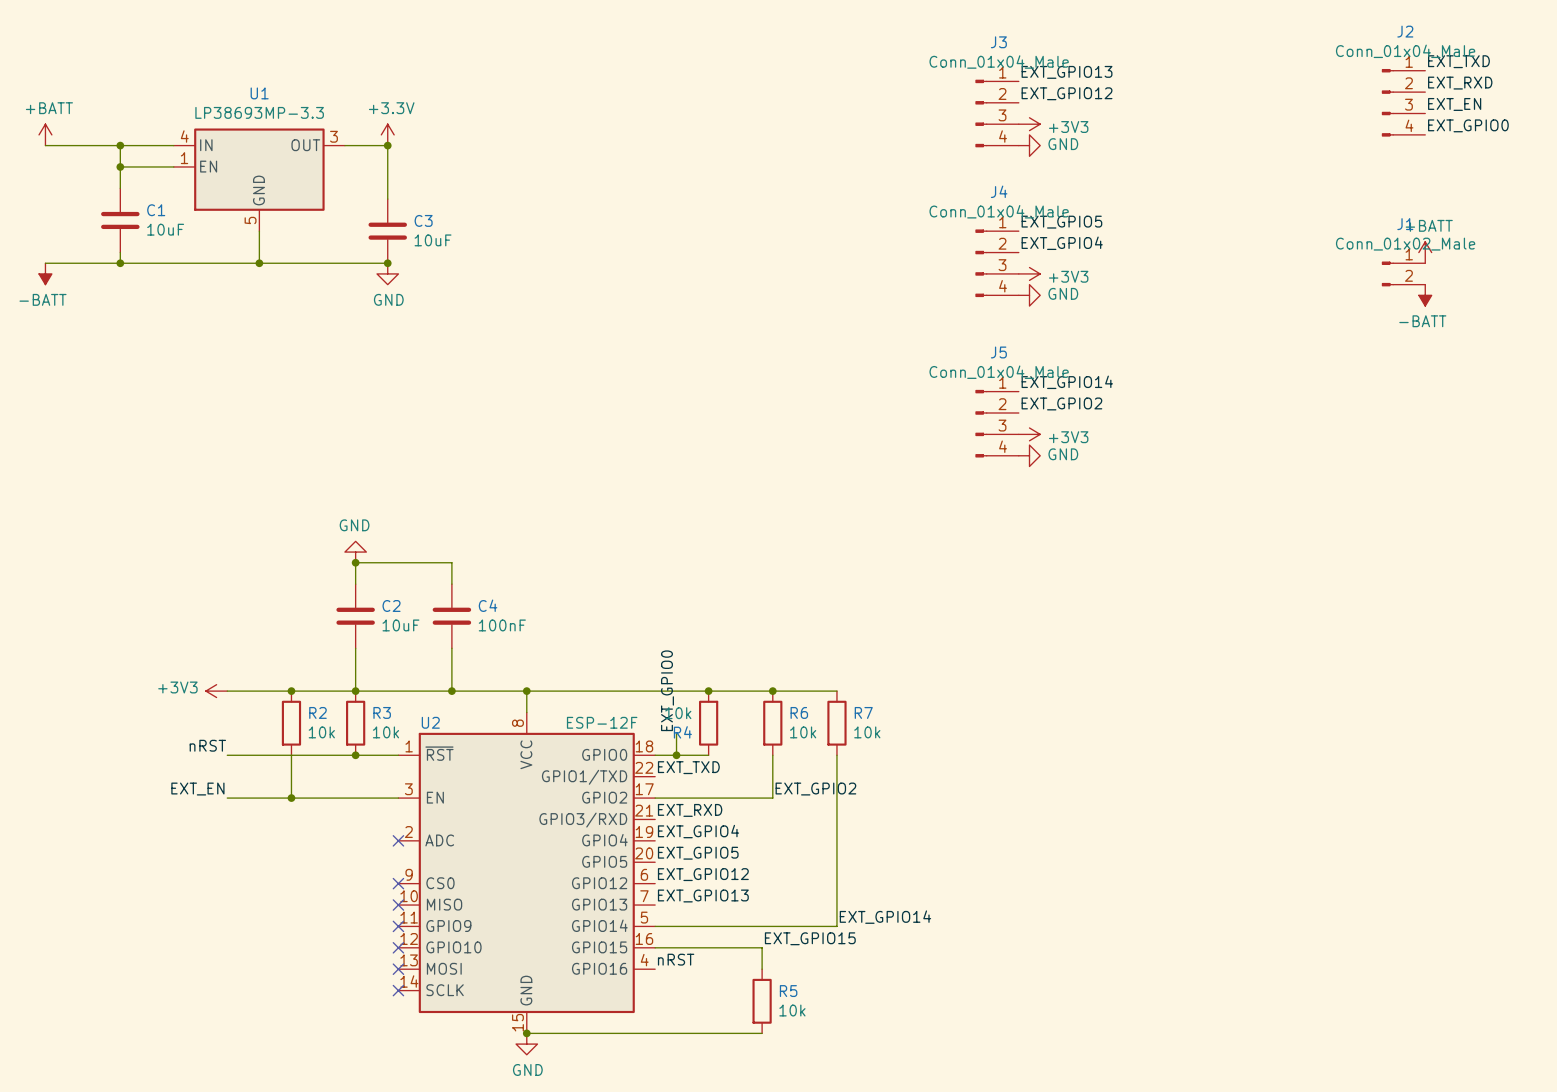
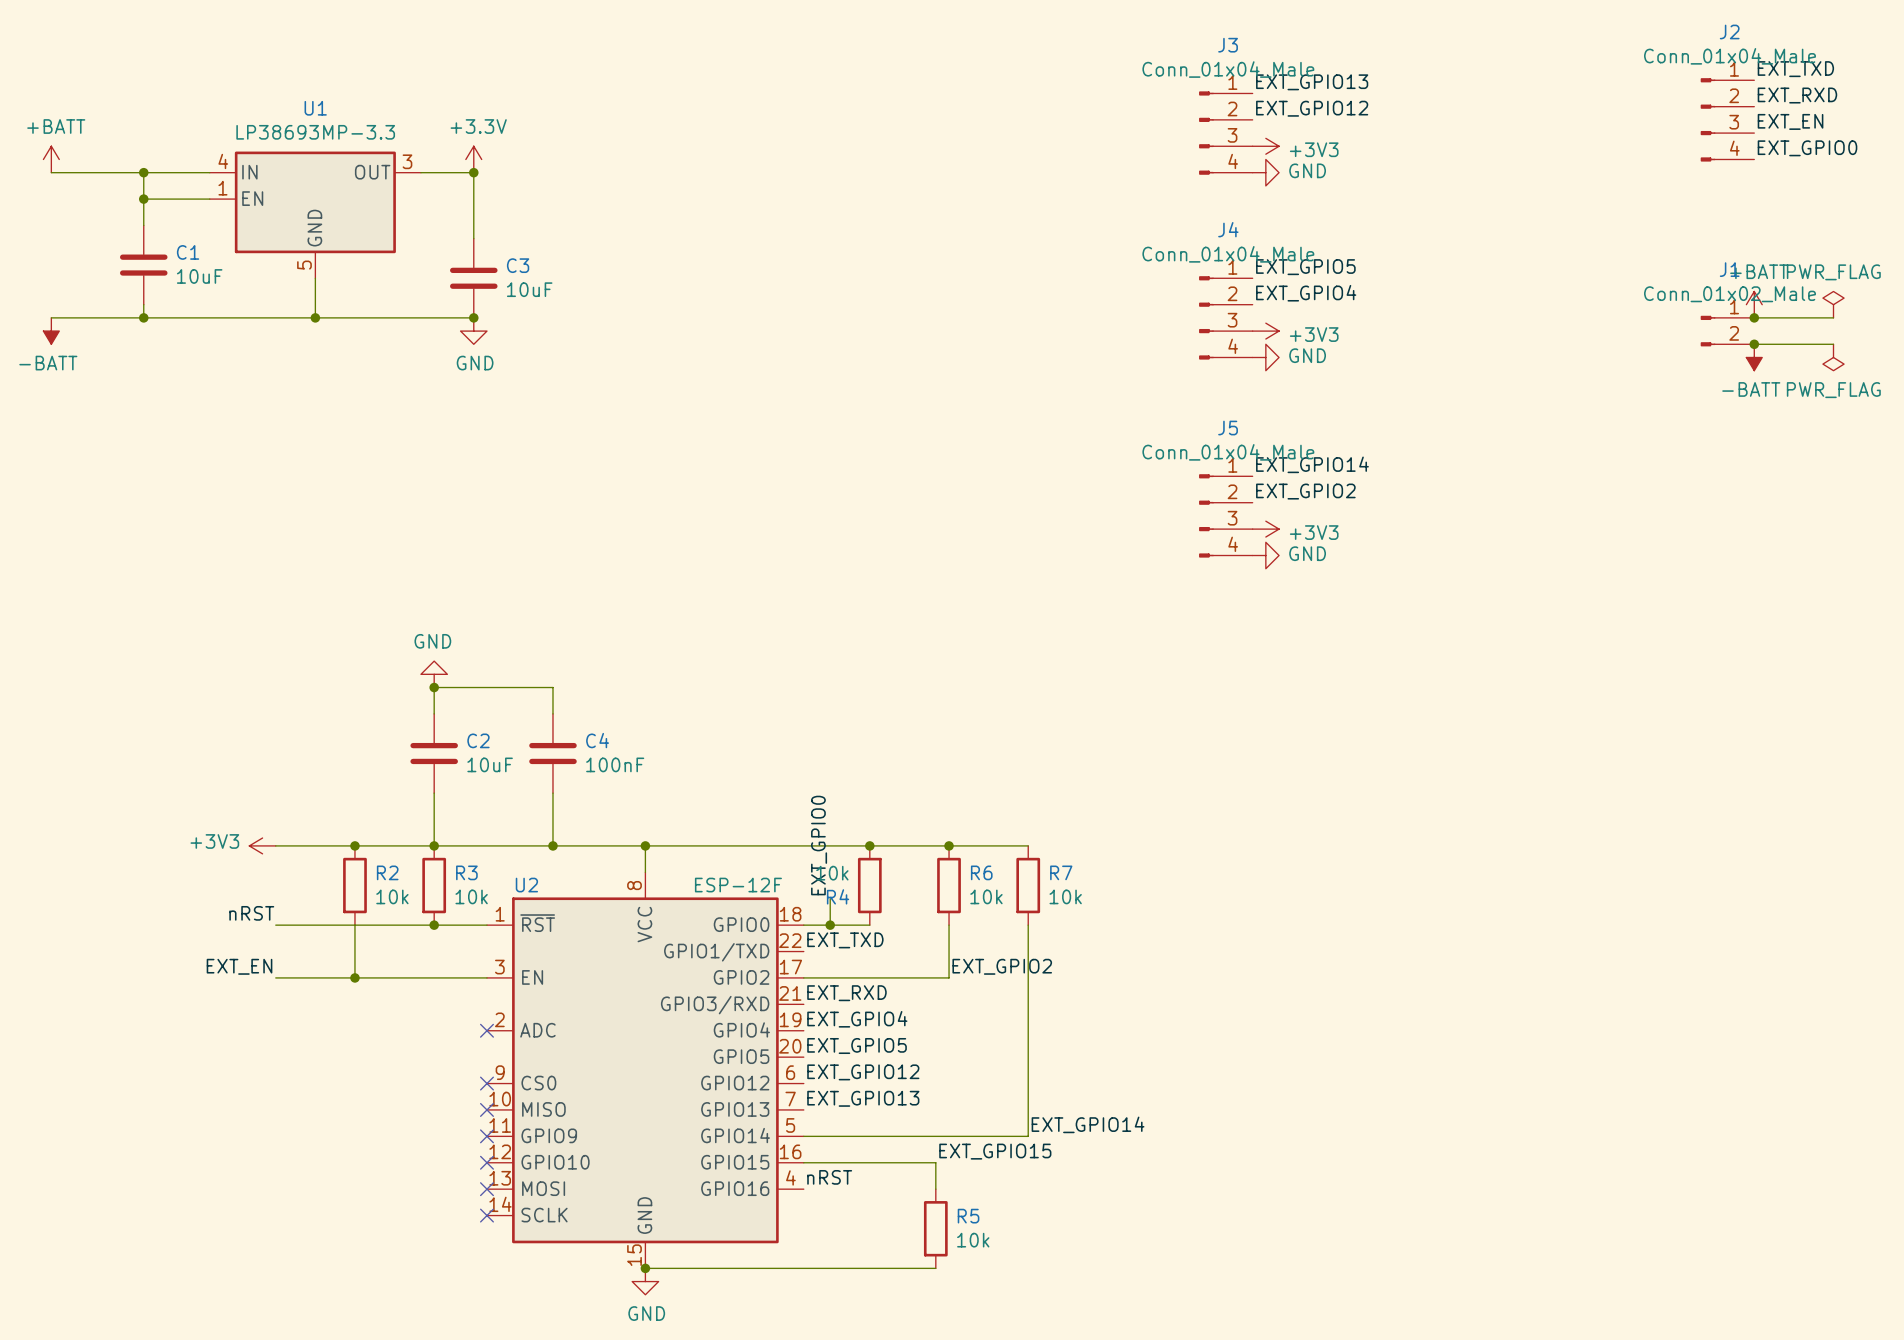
power symbol: none -> PWR_FLAG (1833, 304)
wire: none -> (1754, 317) (1833, 317)
junction: none -> (1754, 317)
wire: none -> (1754, 344) (1833, 344)
junction: none -> (1754, 344)
power symbol: none -> PWR_FLAG (1833, 357)

